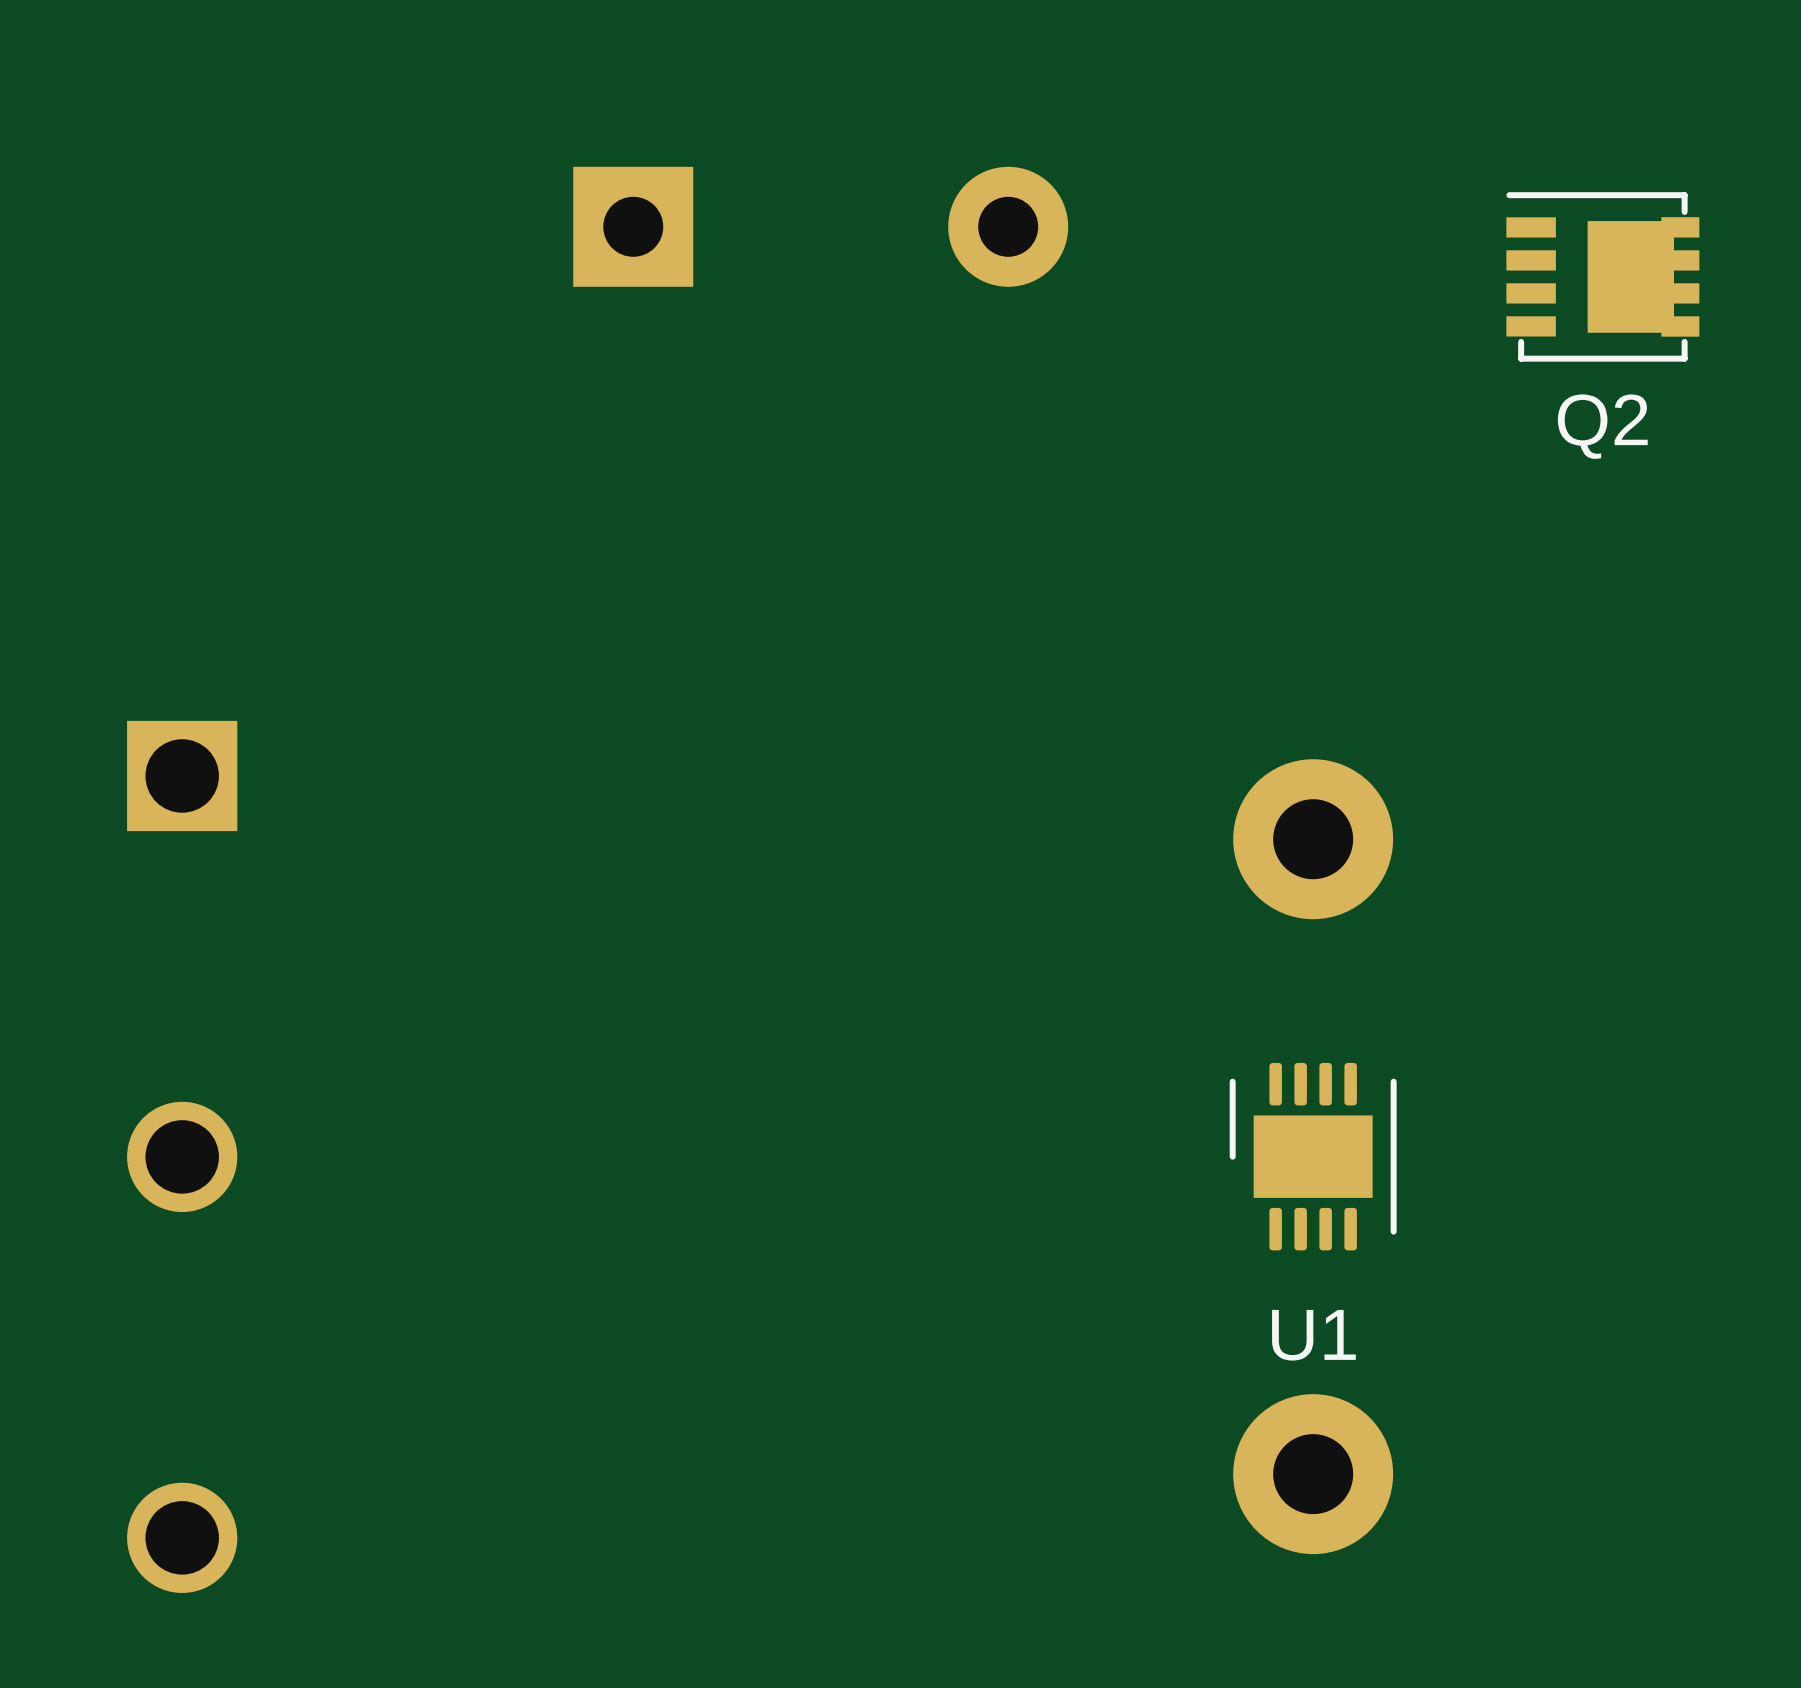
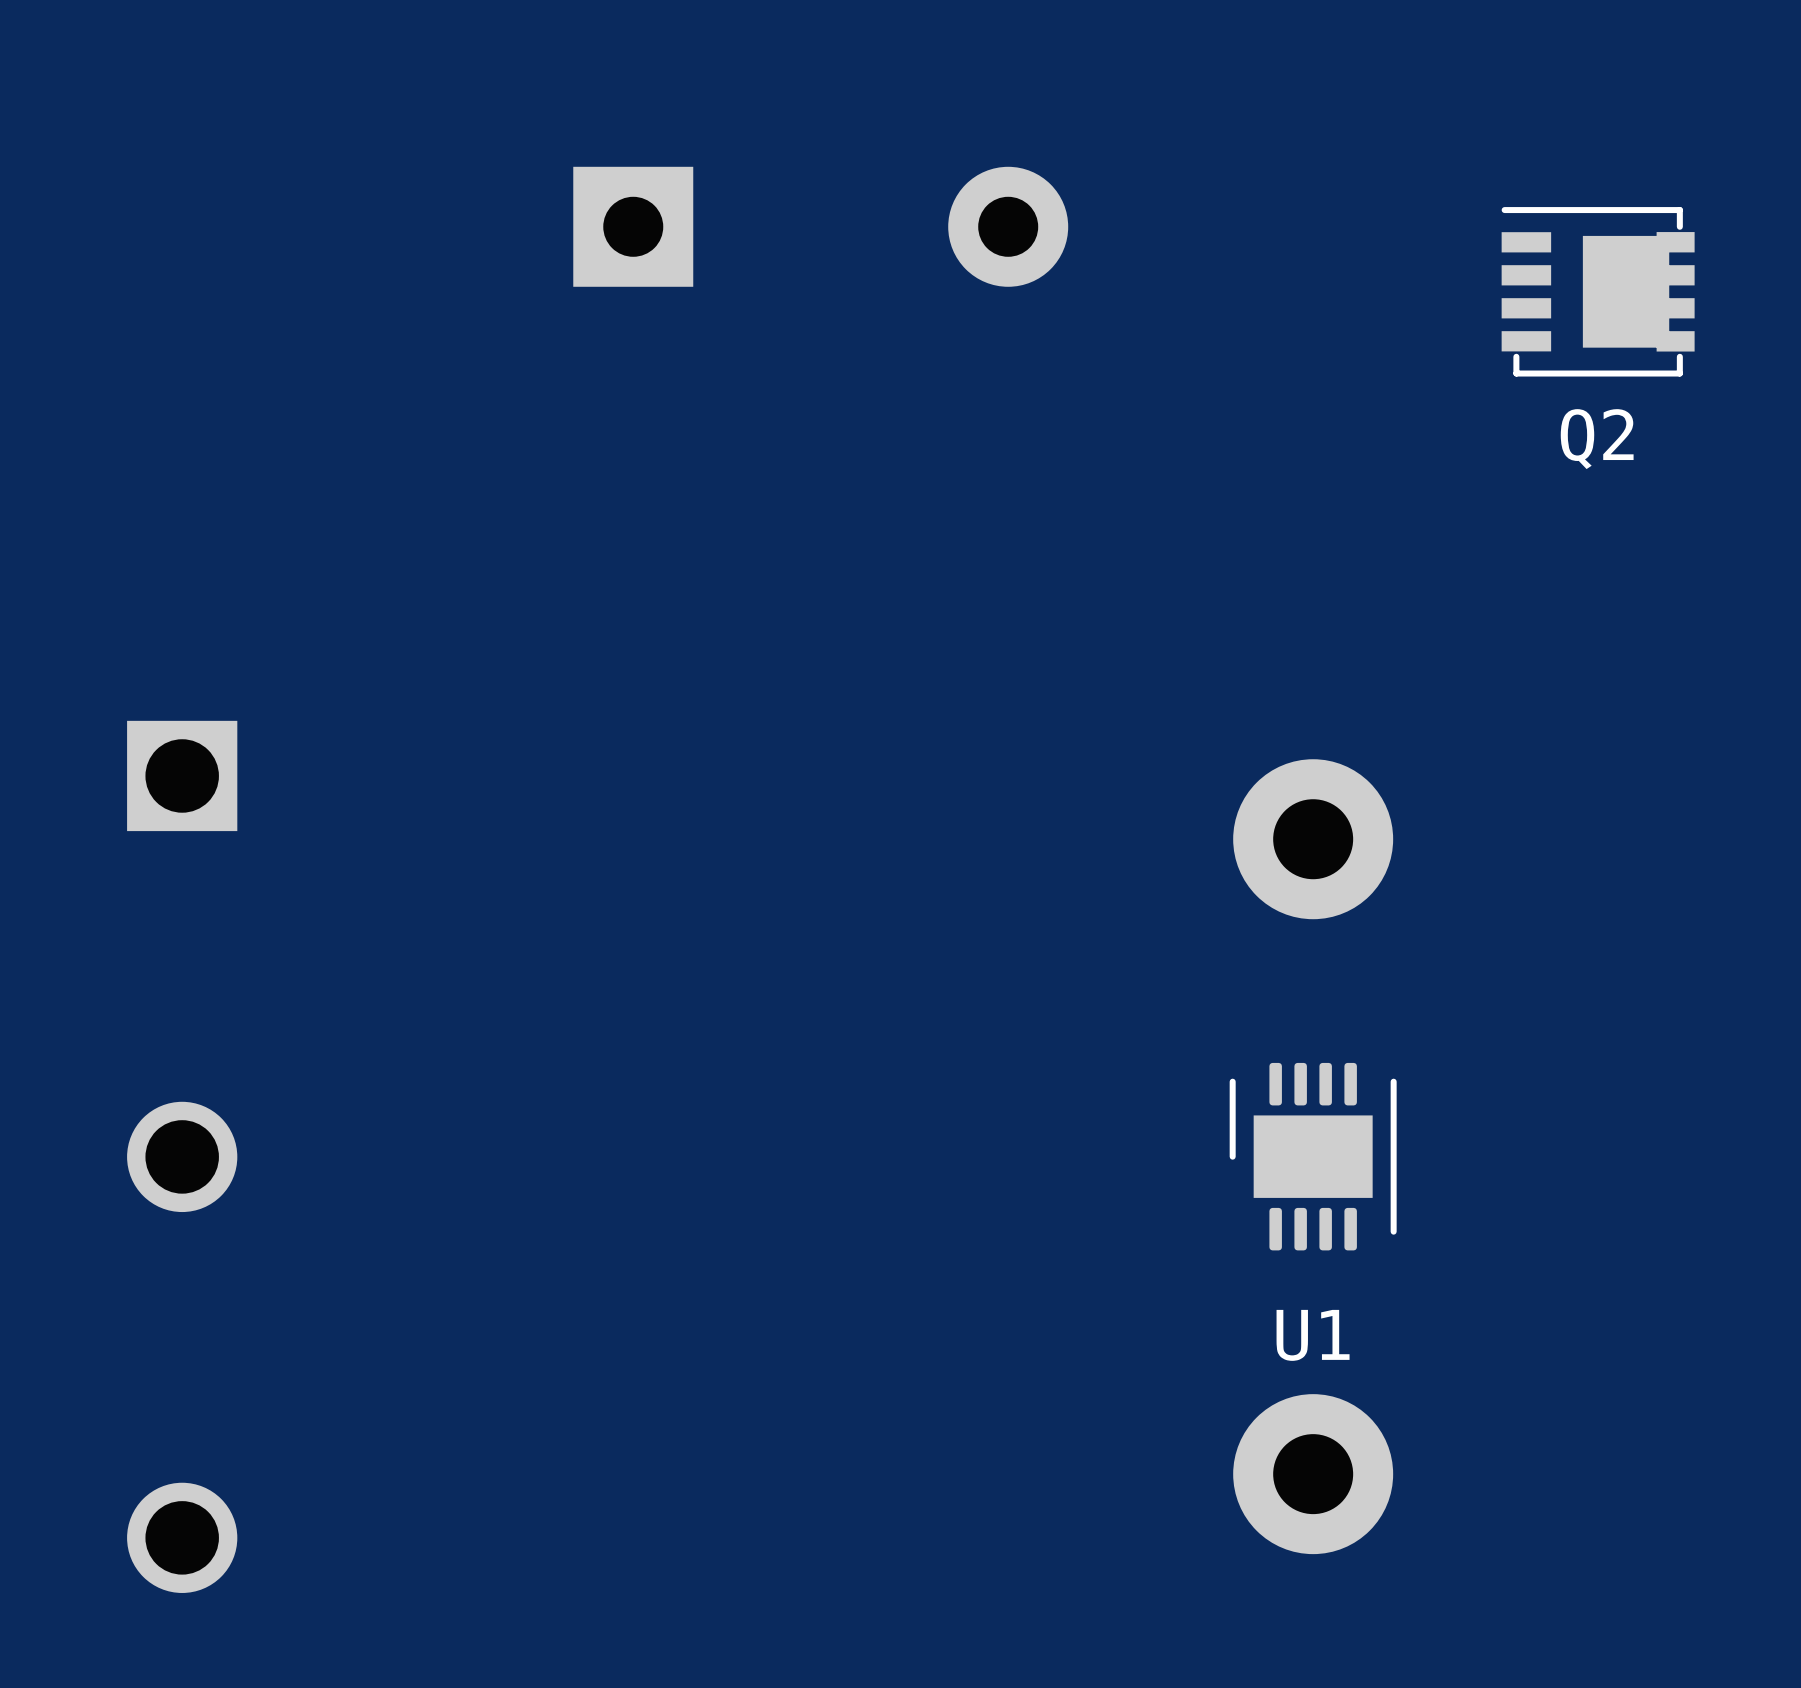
Q2 position: (1602, 276) -> (1598, 291)

